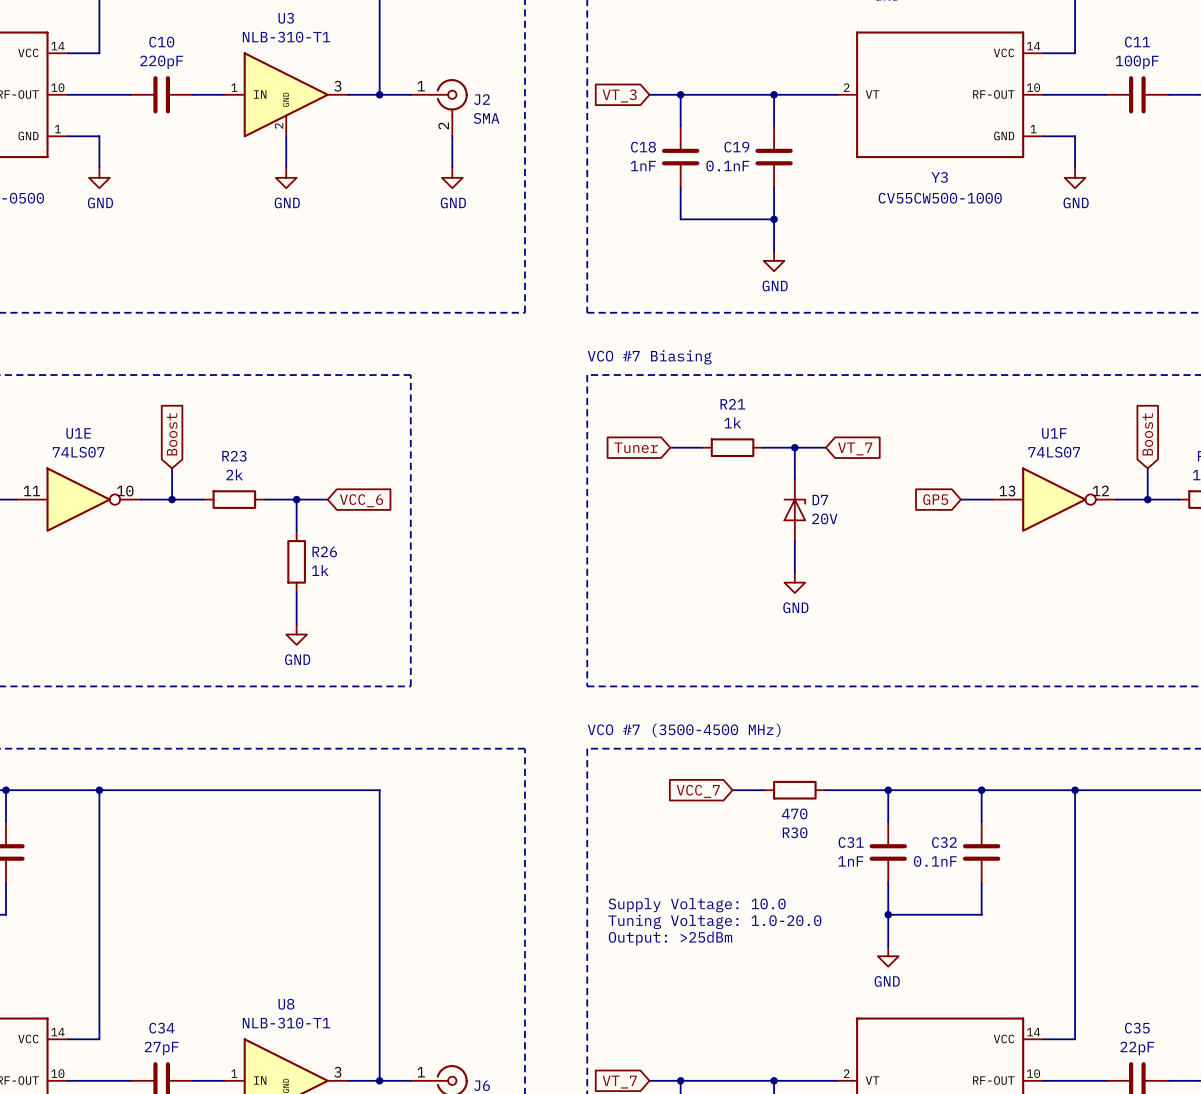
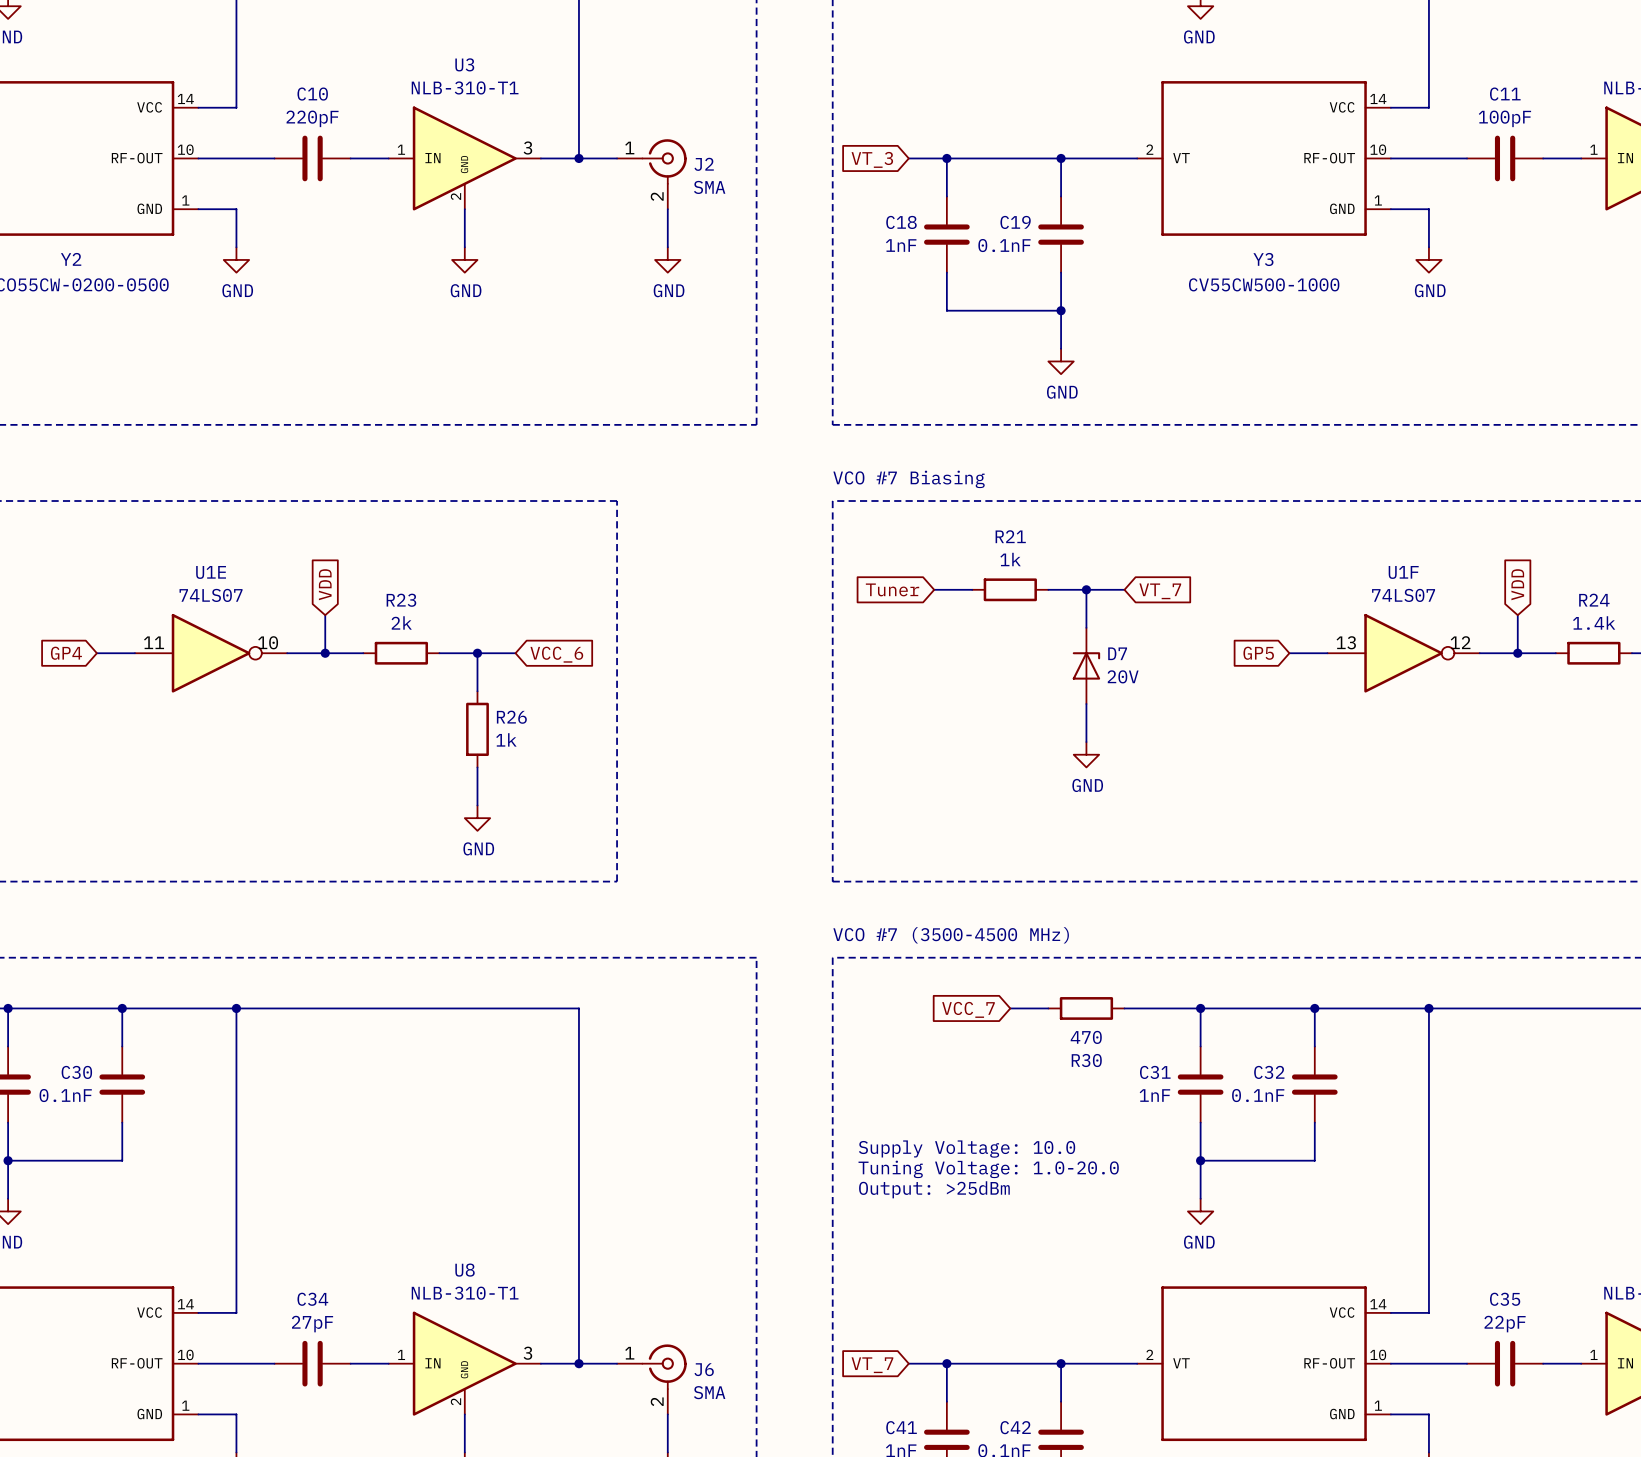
global label: Boost (172, 434) -> VDD (325, 584)
global label: Boost (1147, 434) -> VDD (1517, 584)

